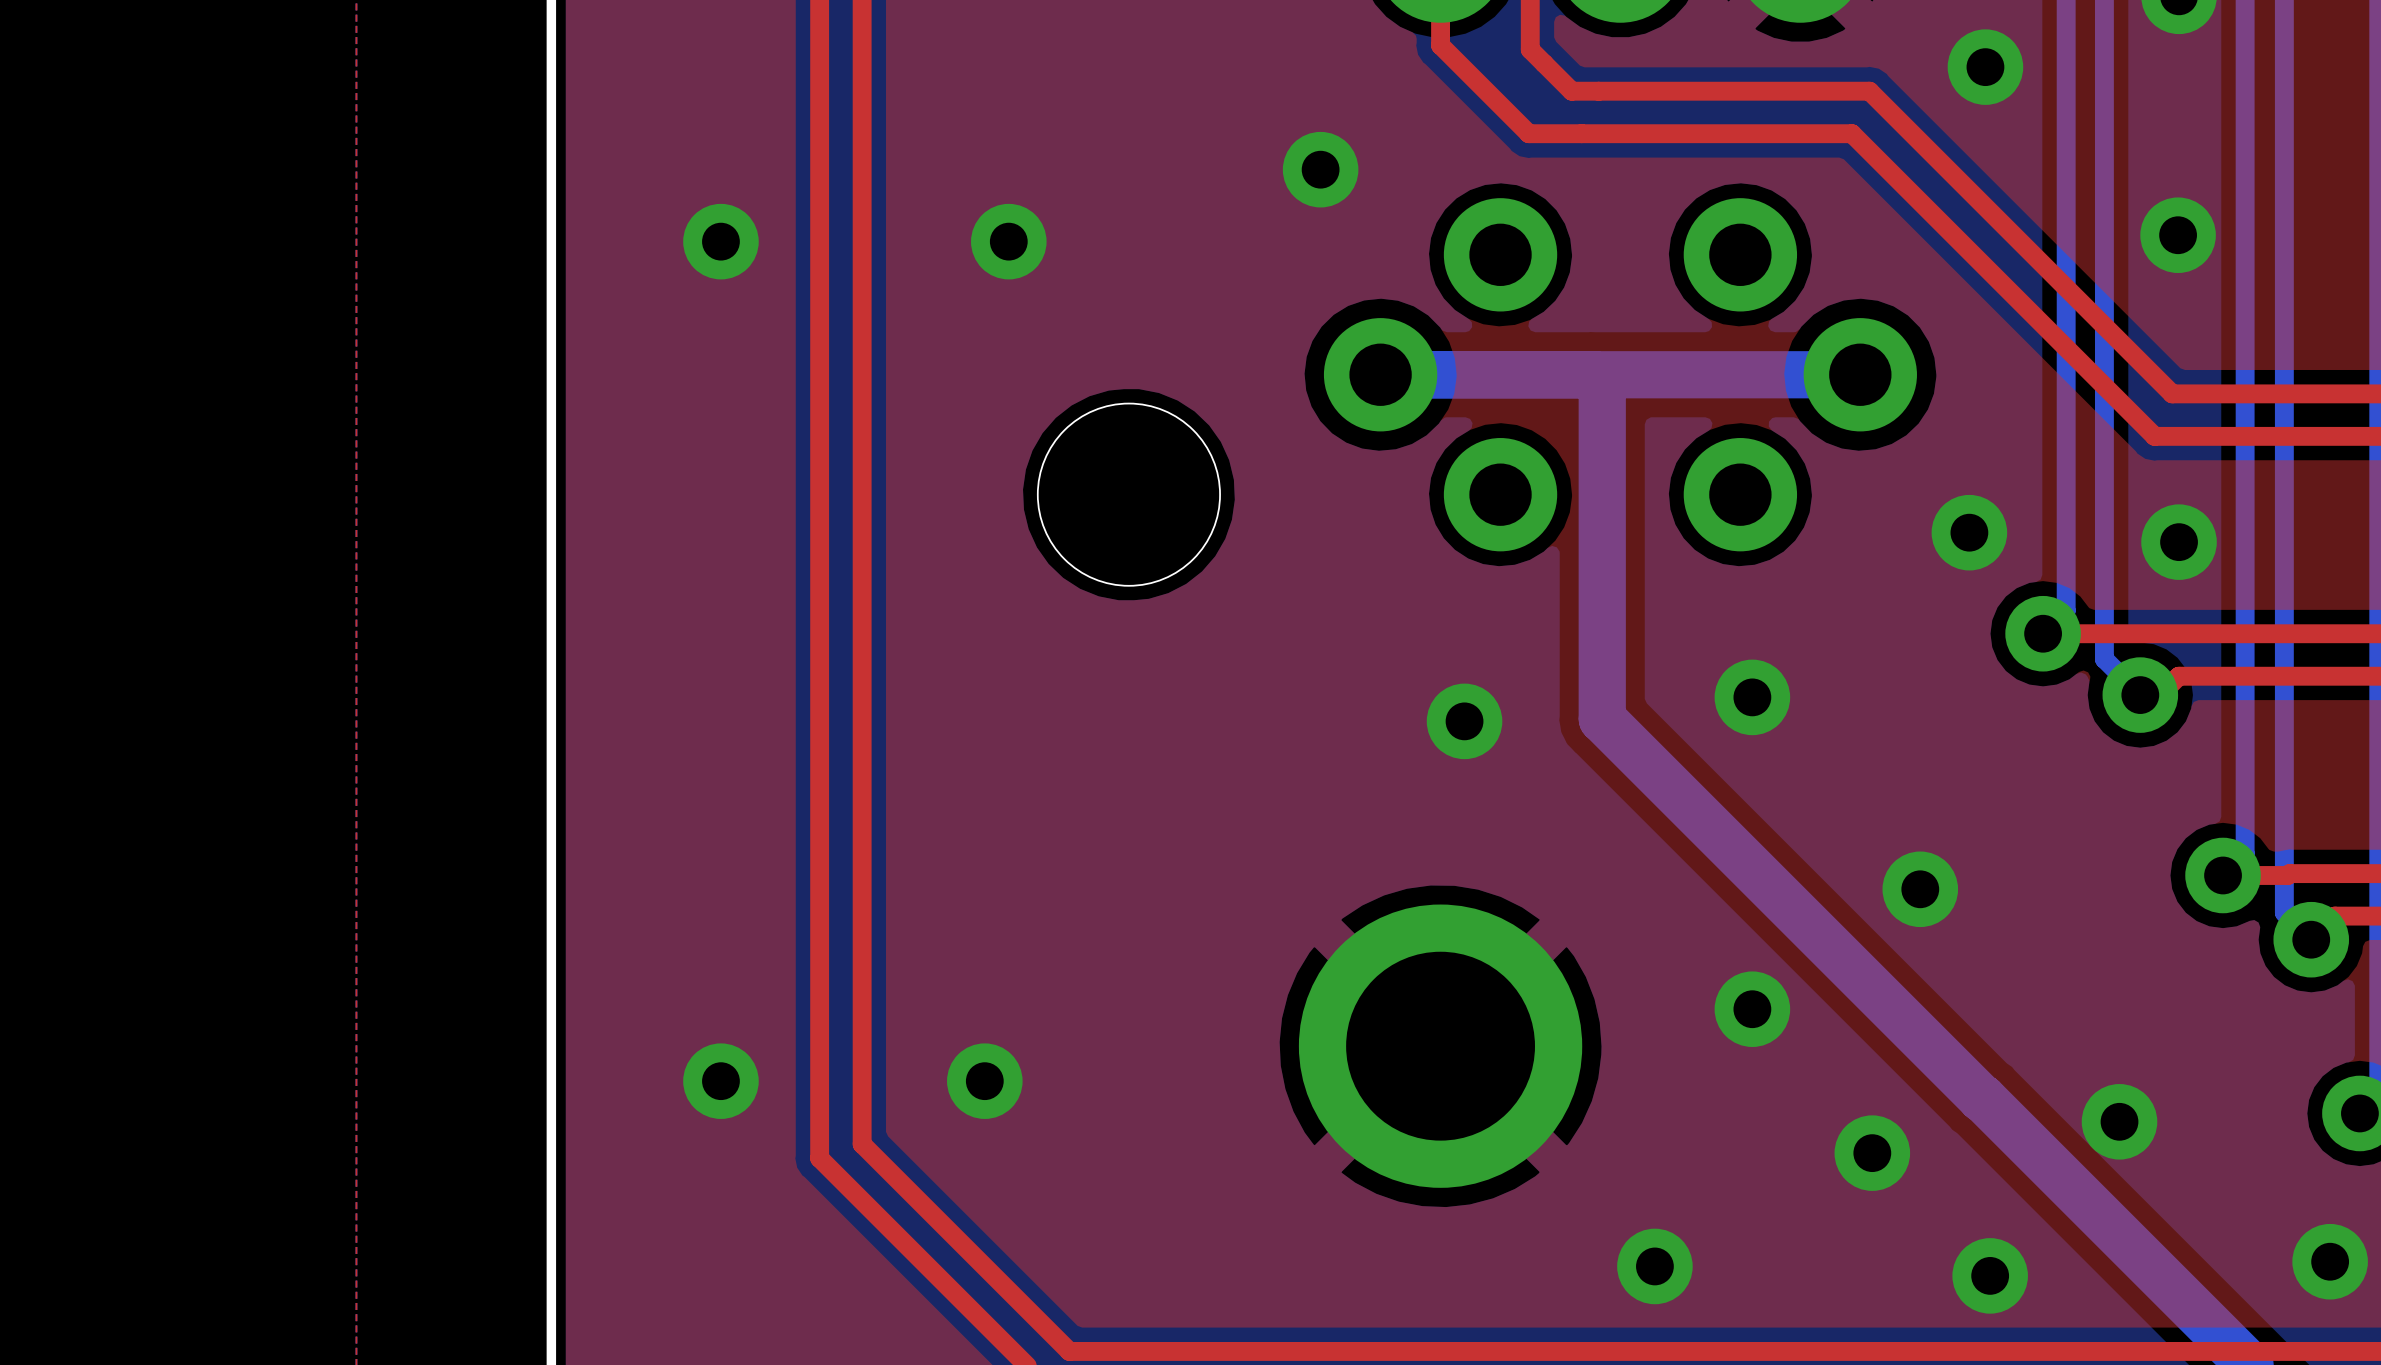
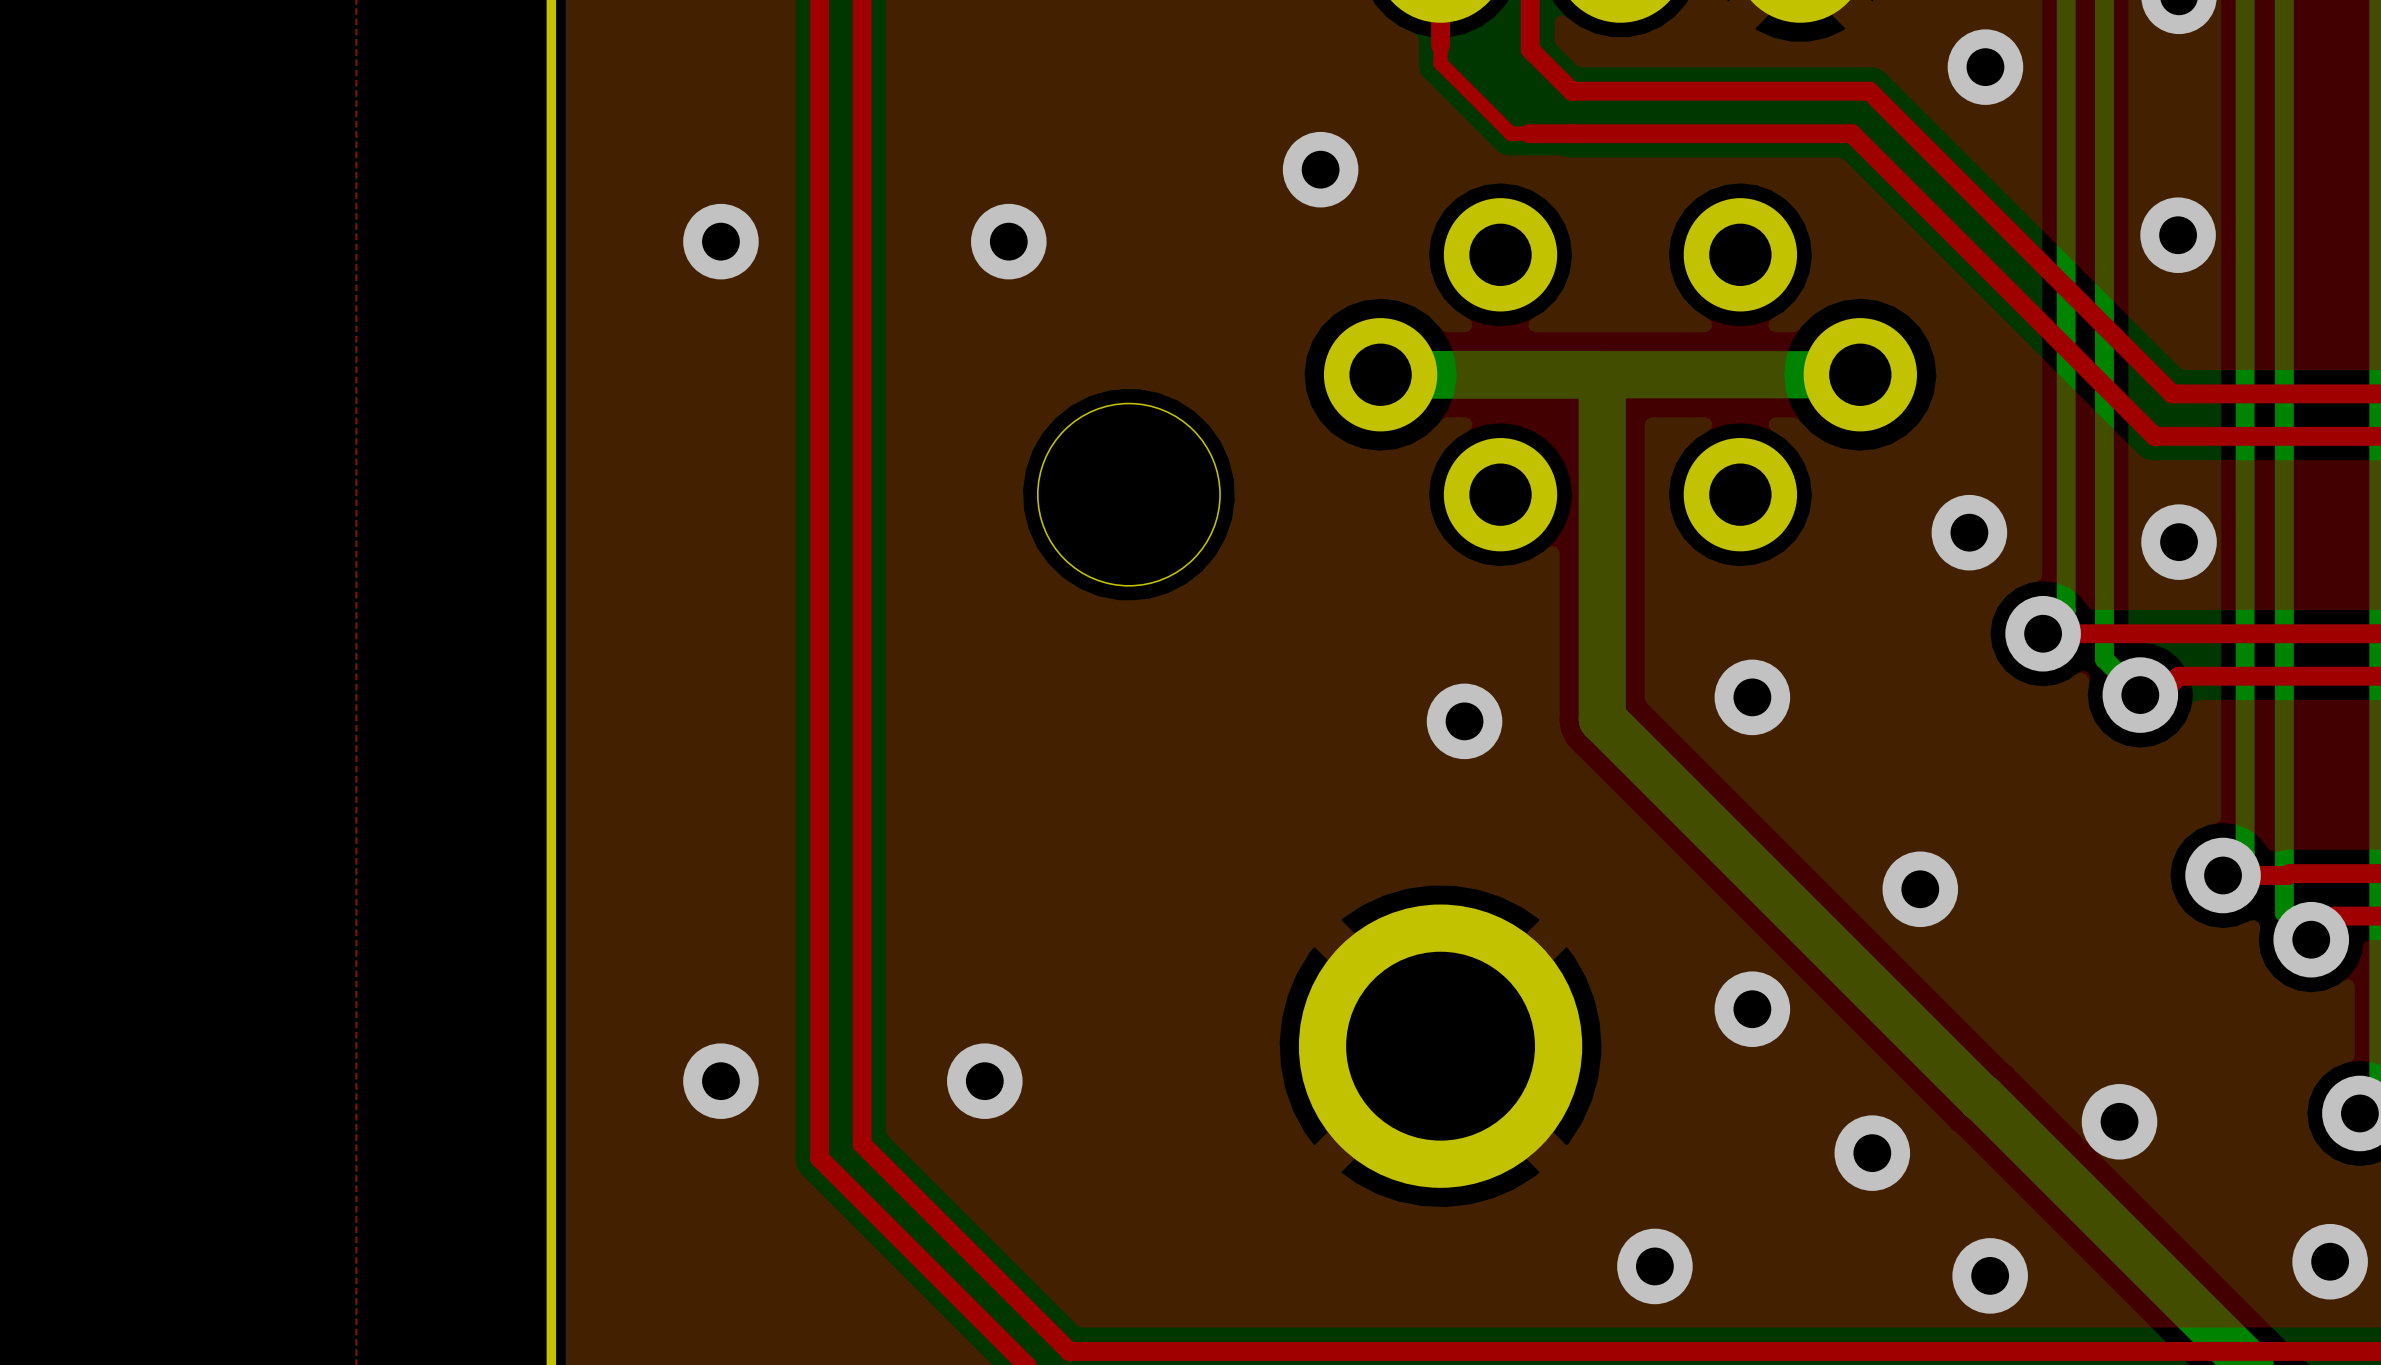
top track: (1440, 45) (1528, 133) -> (1440, 45) (1440, 63) (1510, 133) (1528, 133)

